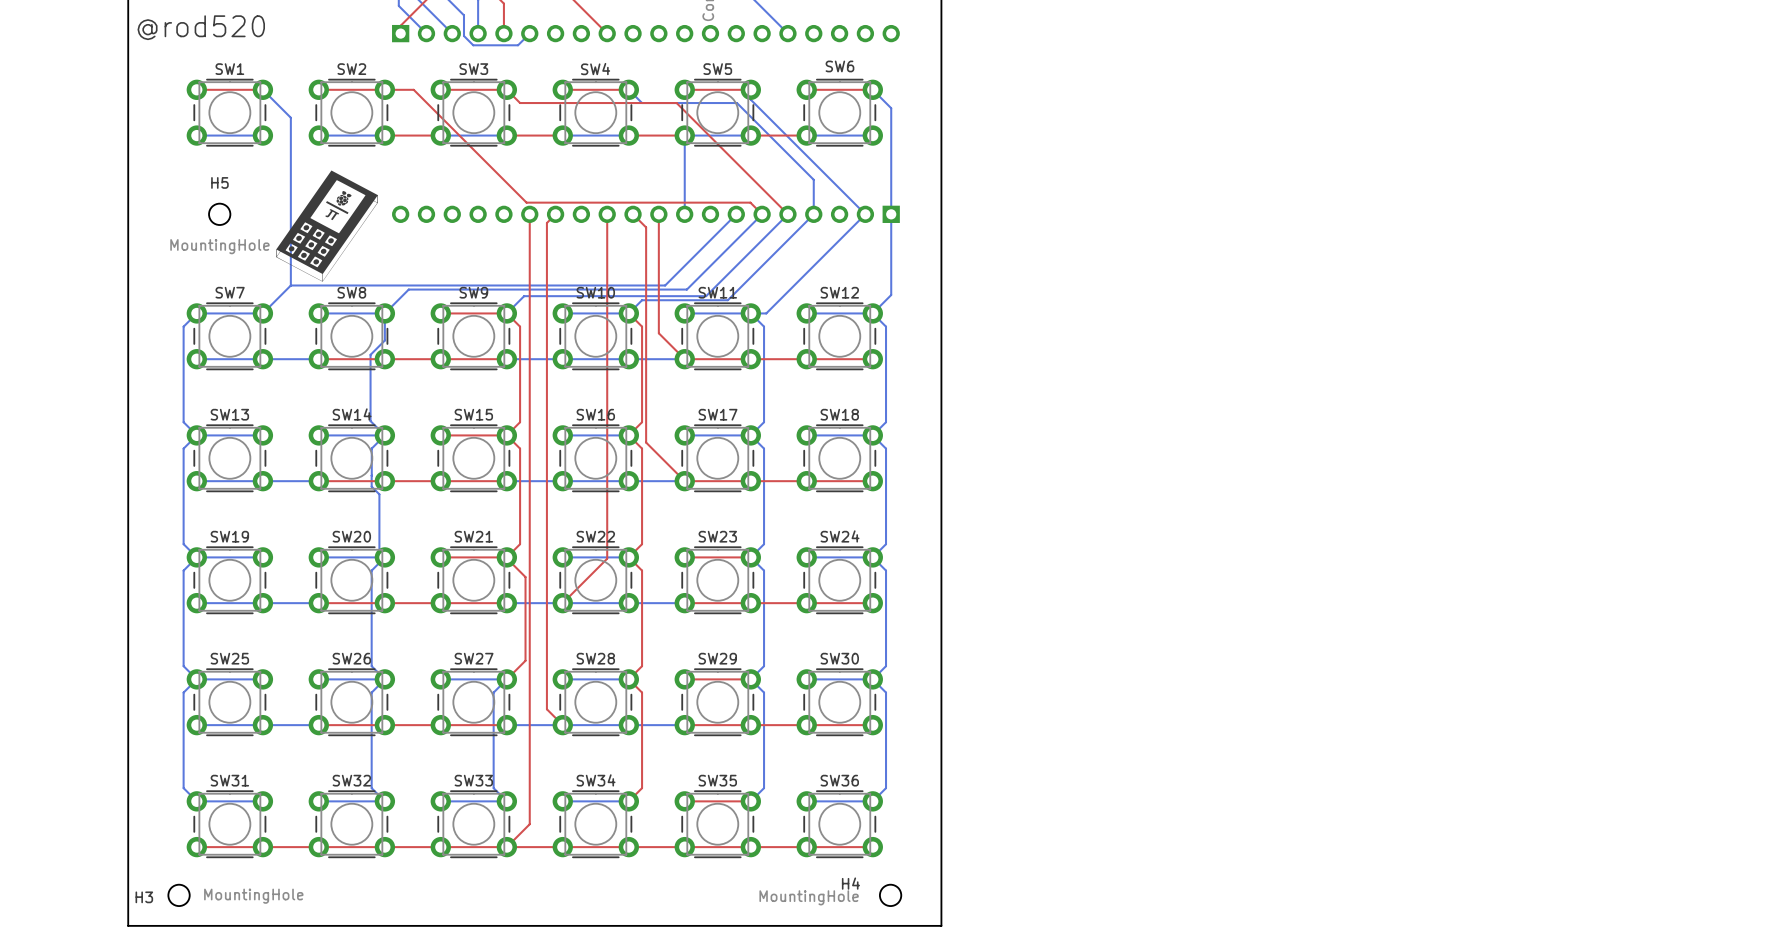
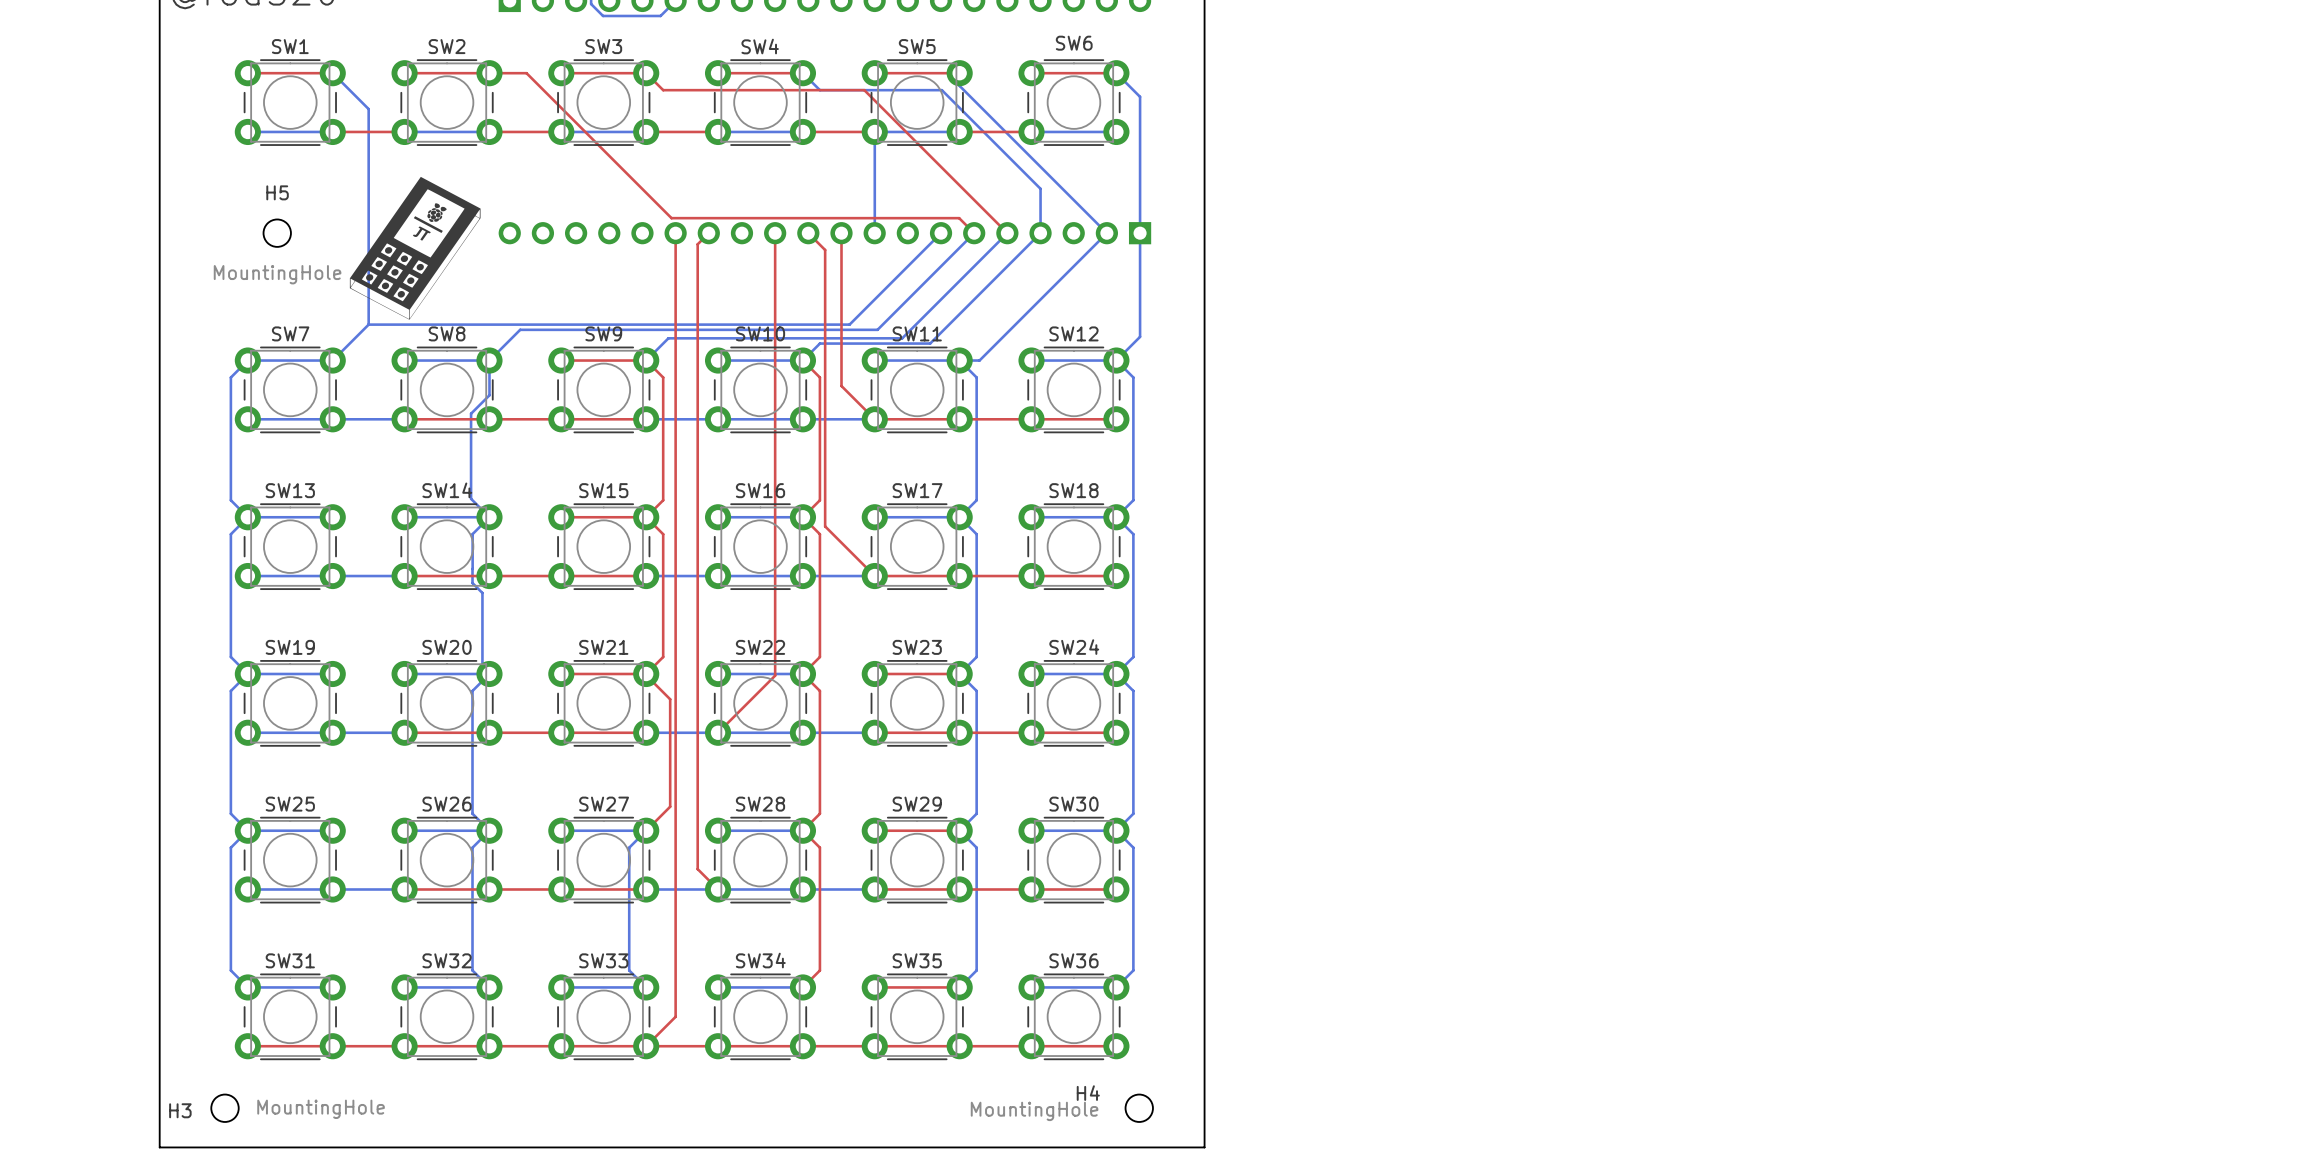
top track: none -> (332, 131) (404, 131)

